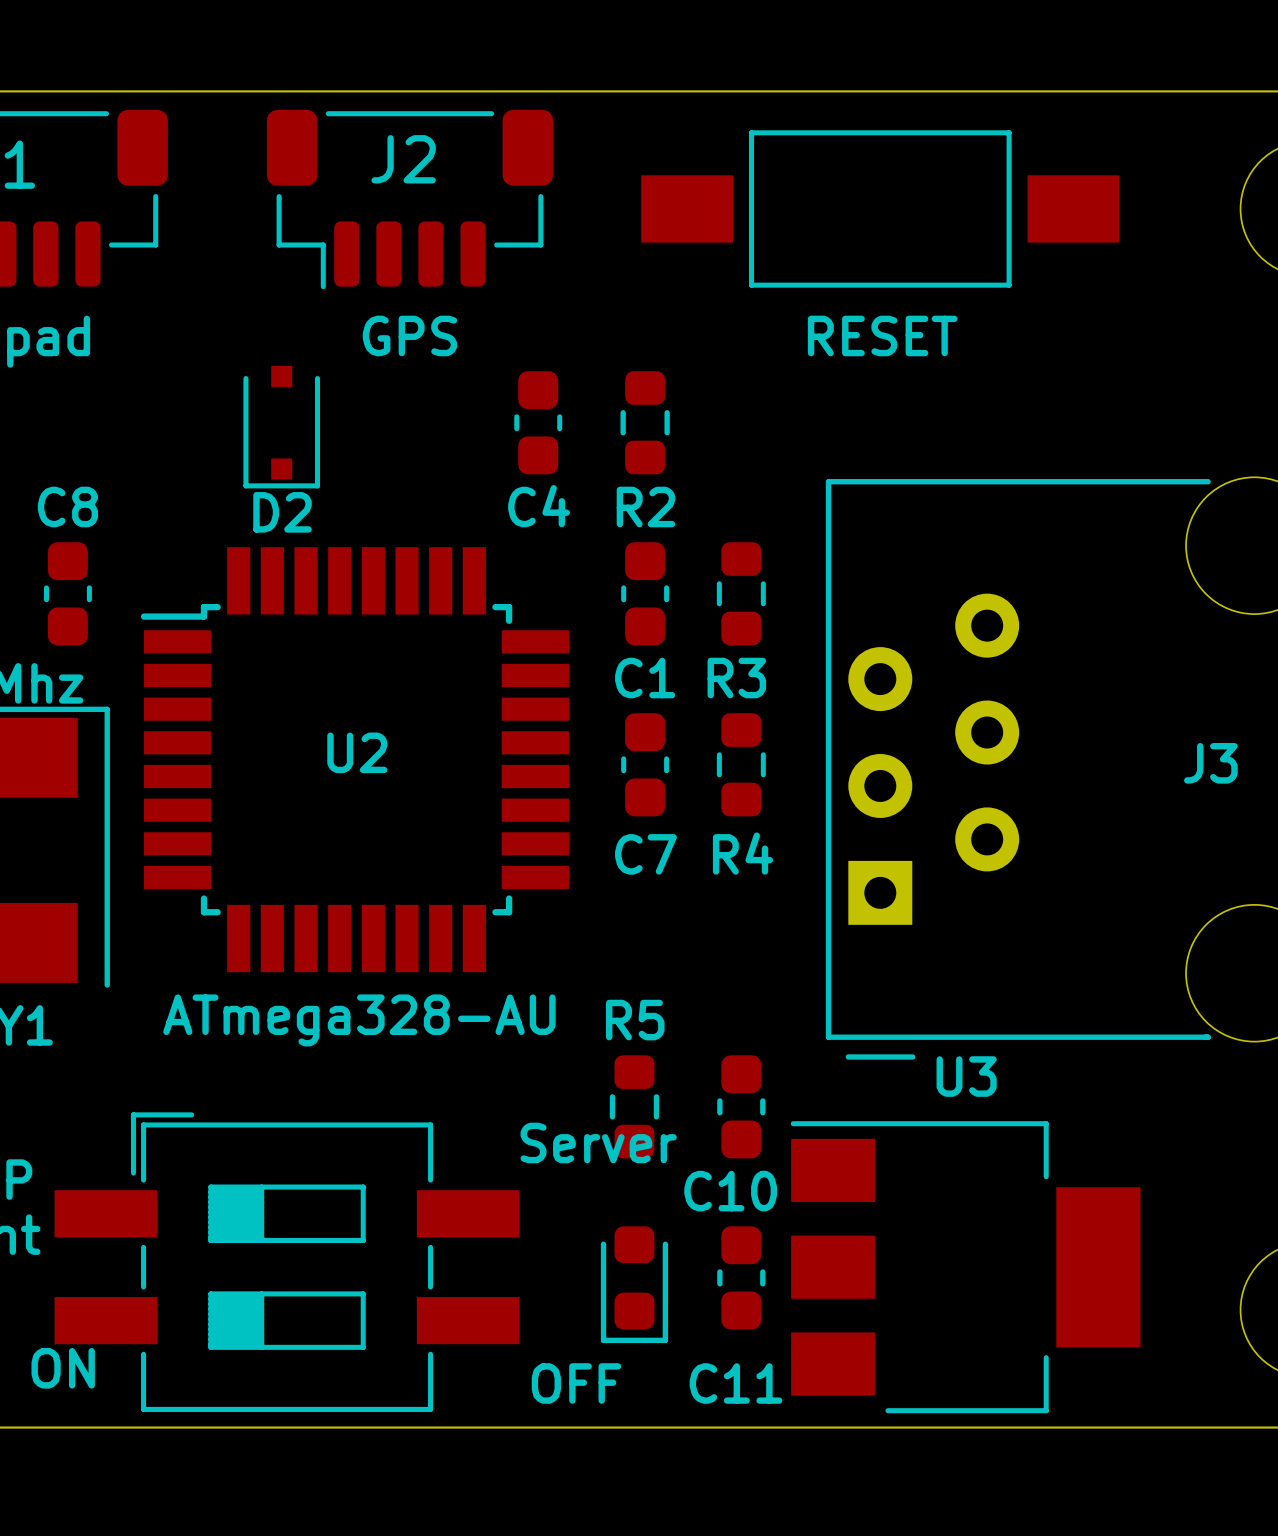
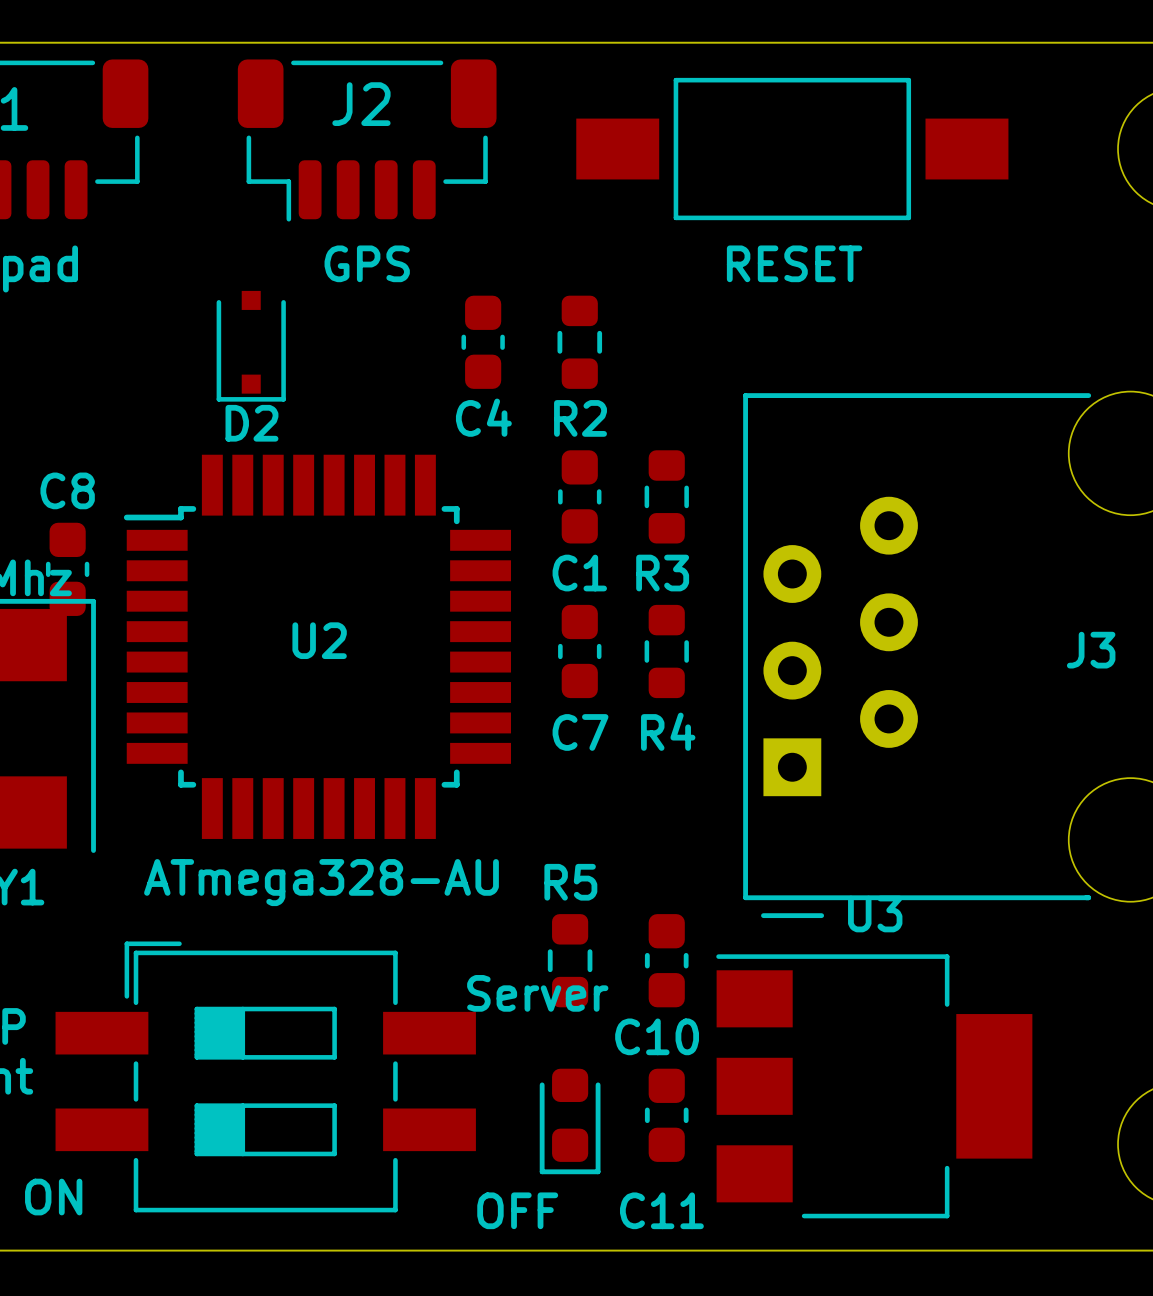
C8 position: (67, 593) -> (67, 569)
part position: (287, 1262) -> (265, 1076)
U3 position: (965, 1267) -> (874, 1086)

